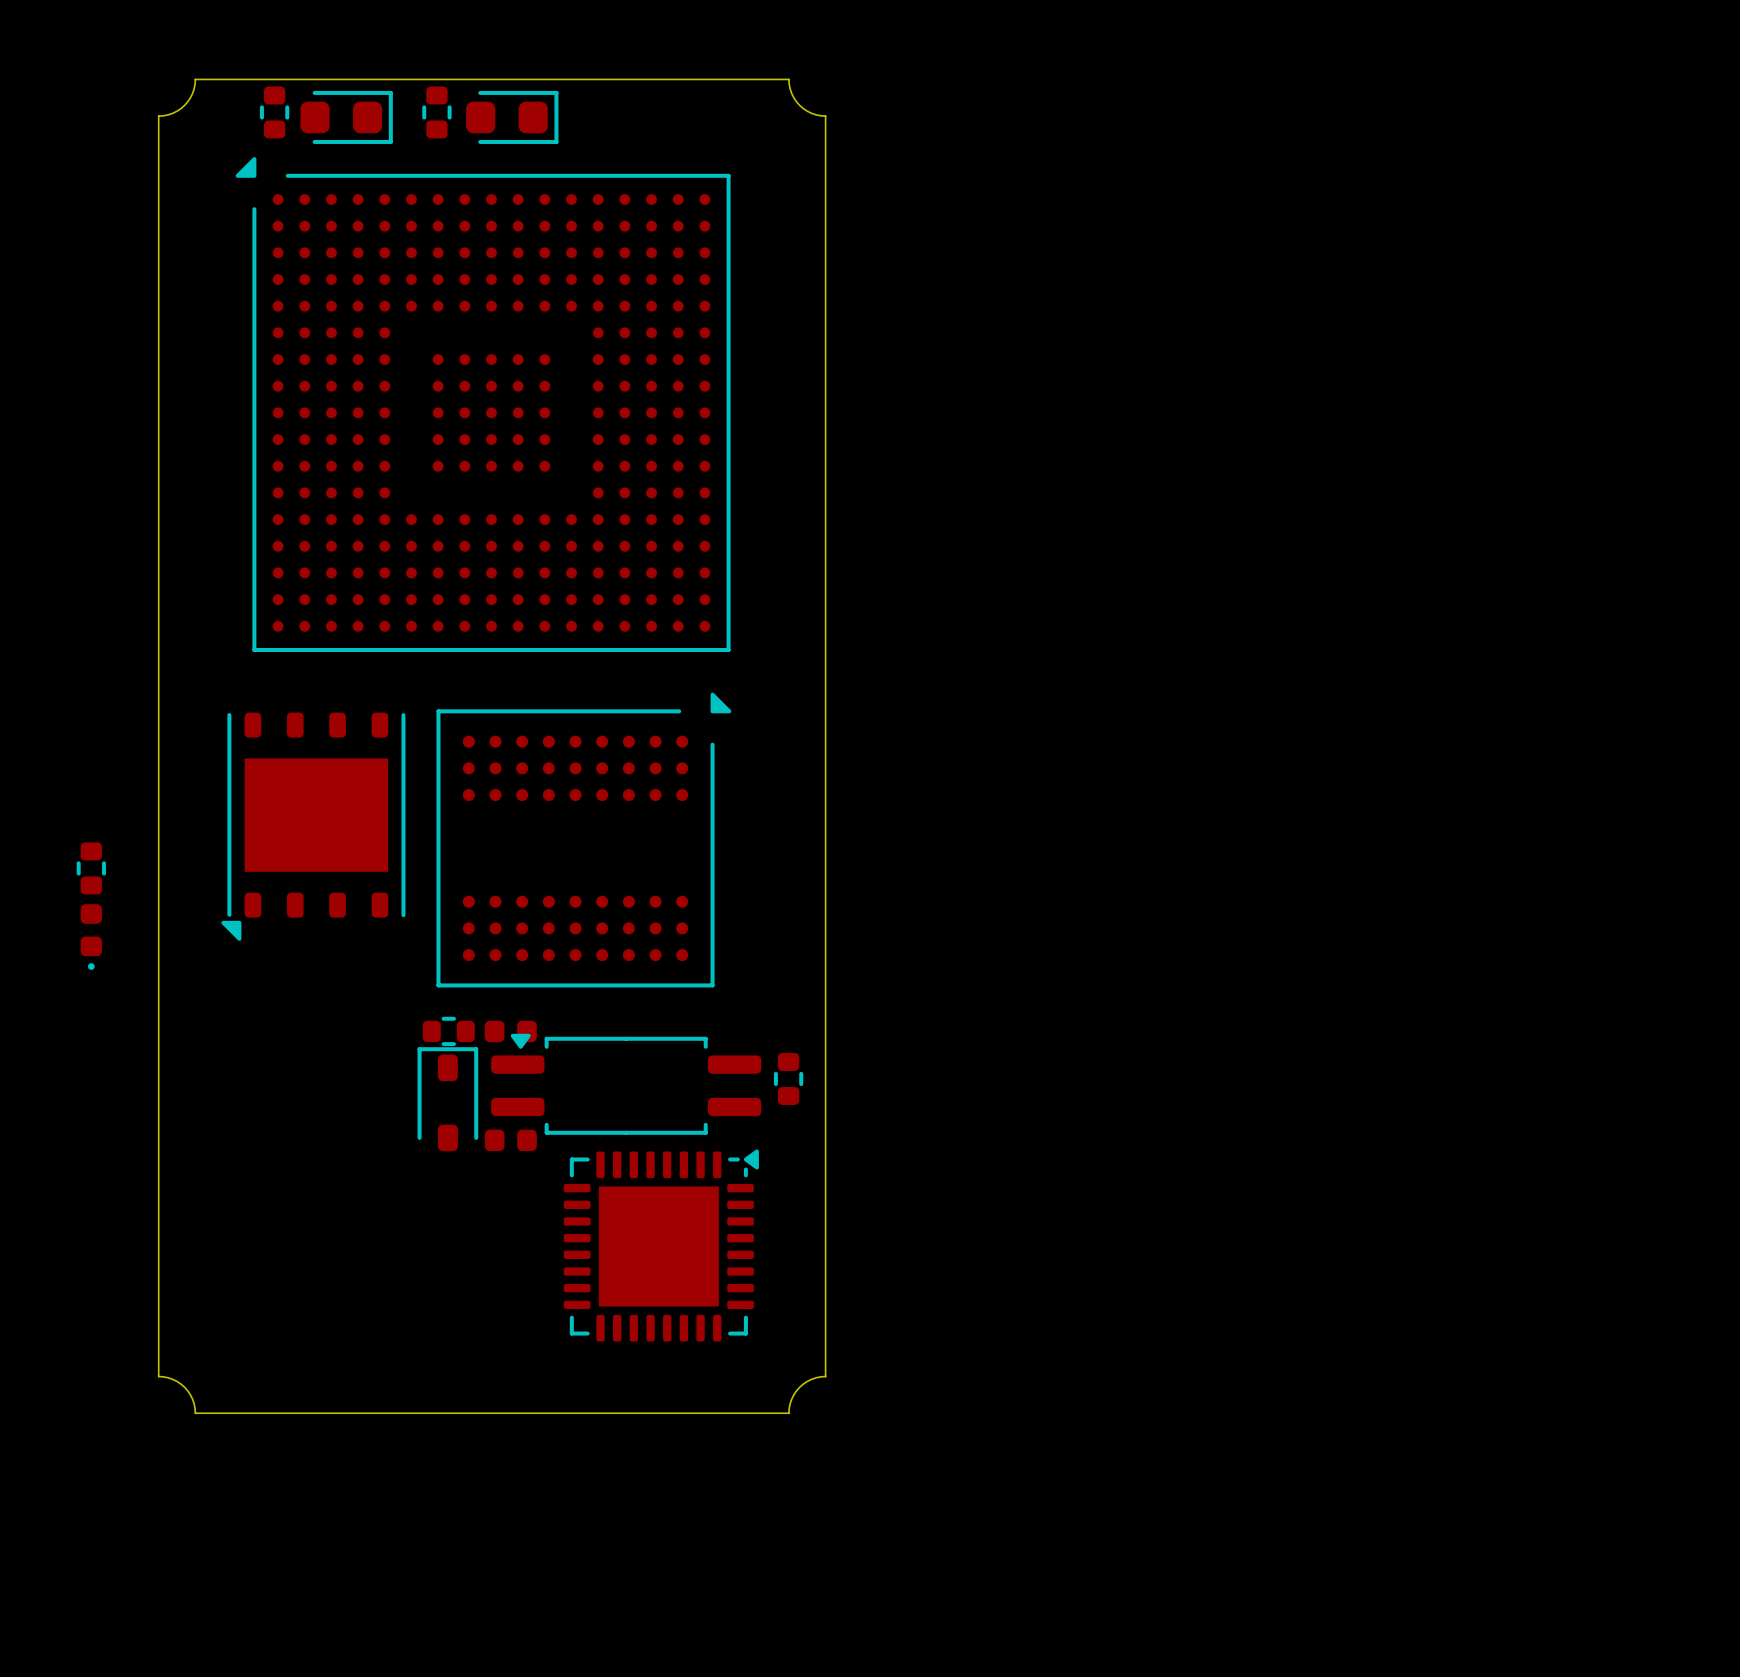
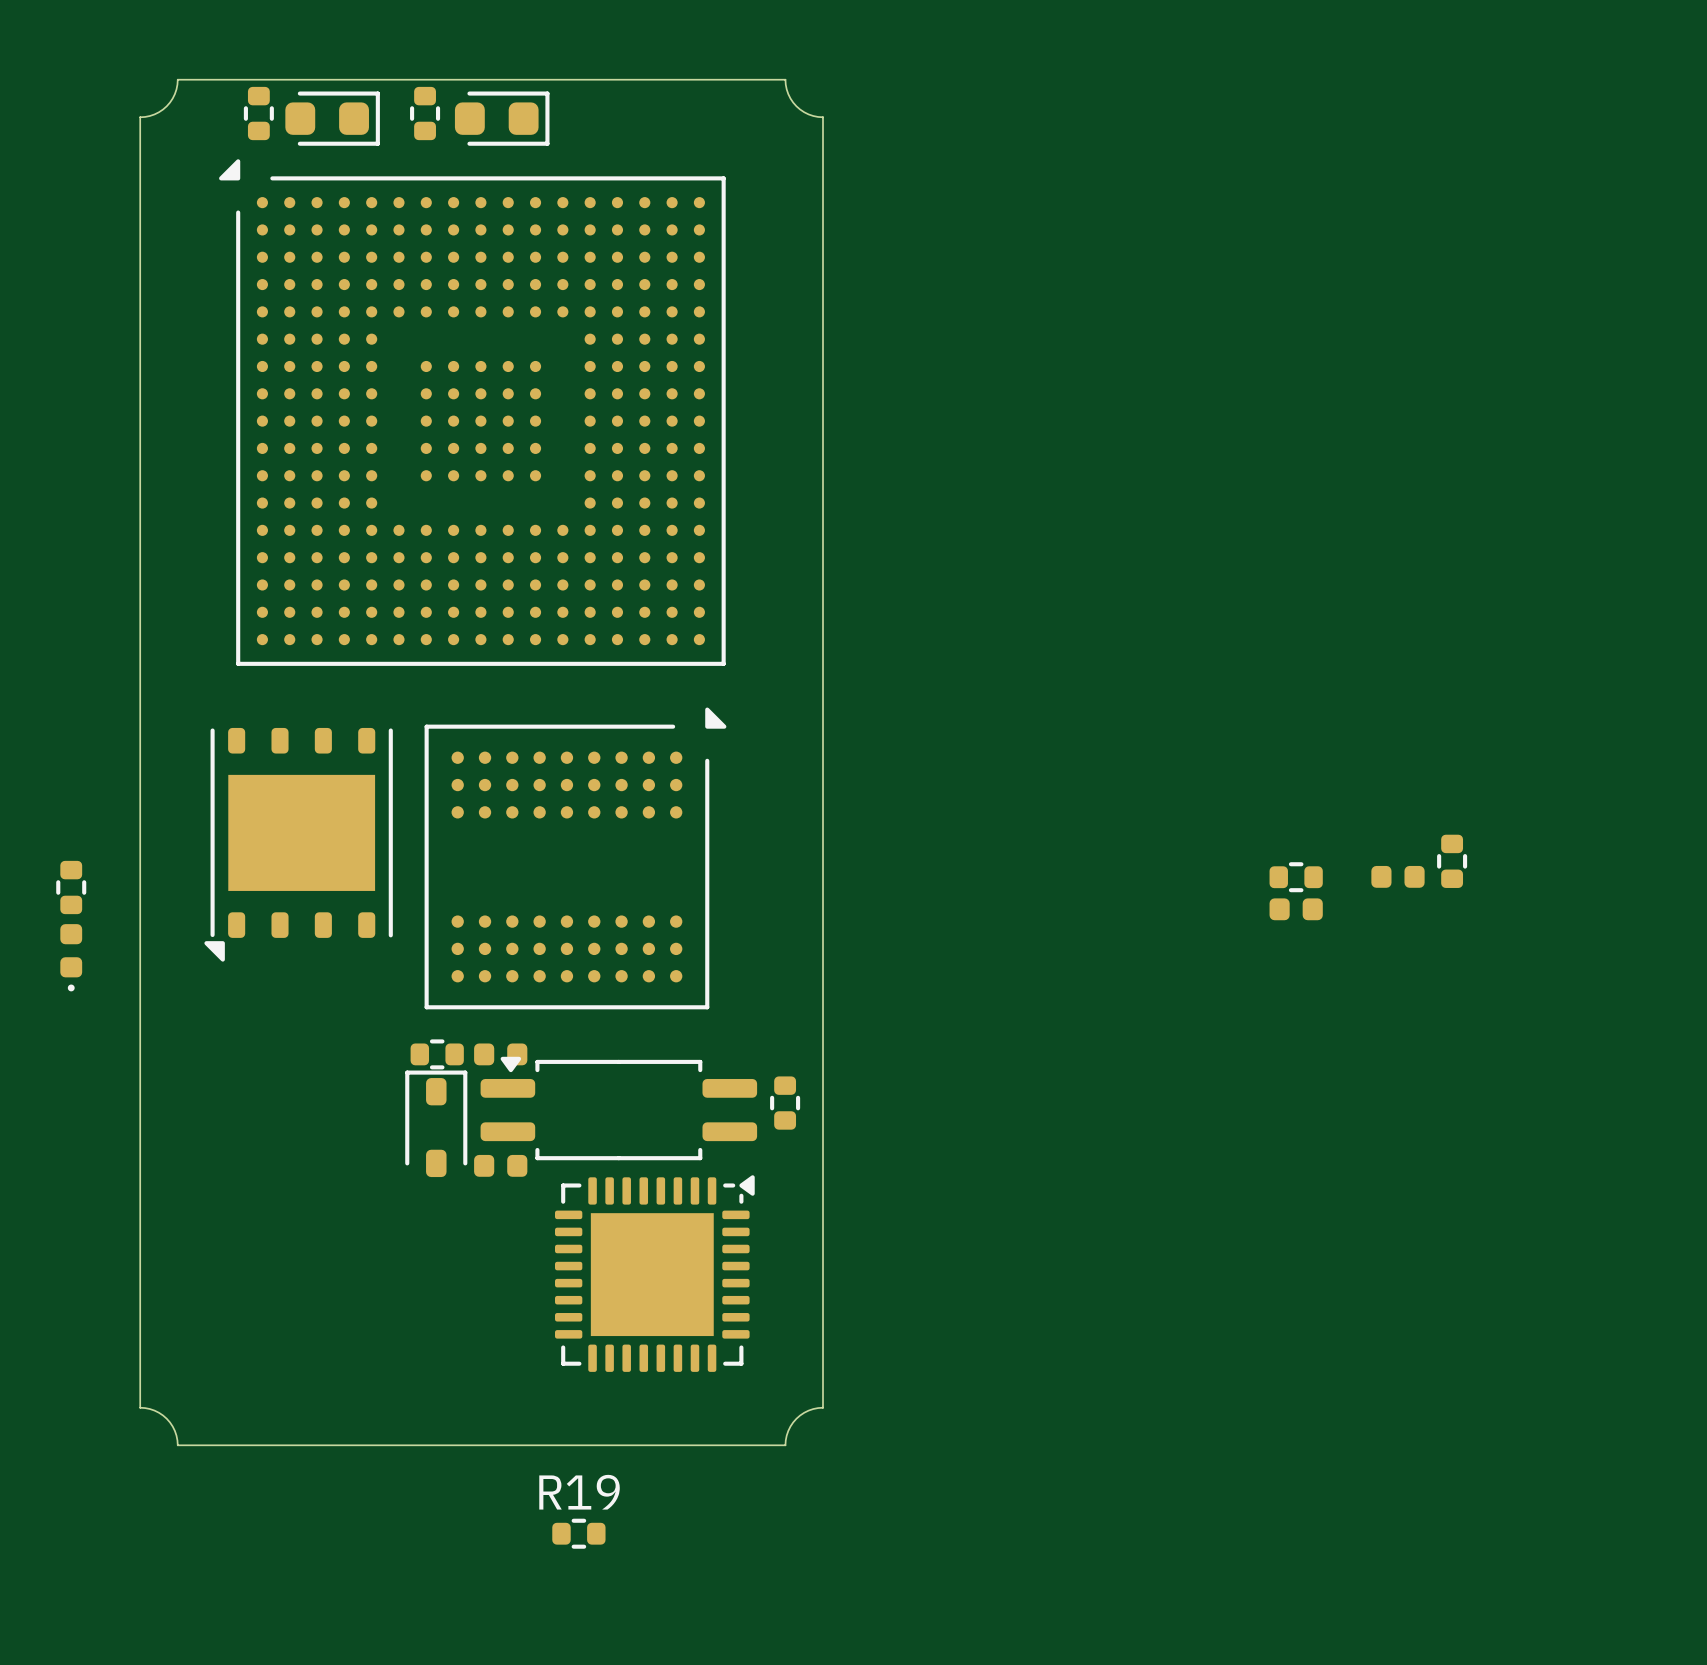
part: none -> (1452, 861)
part: none -> (1296, 877)
part: none -> (1397, 876)
part: none -> (1296, 909)
R19: none -> (578, 1533)

